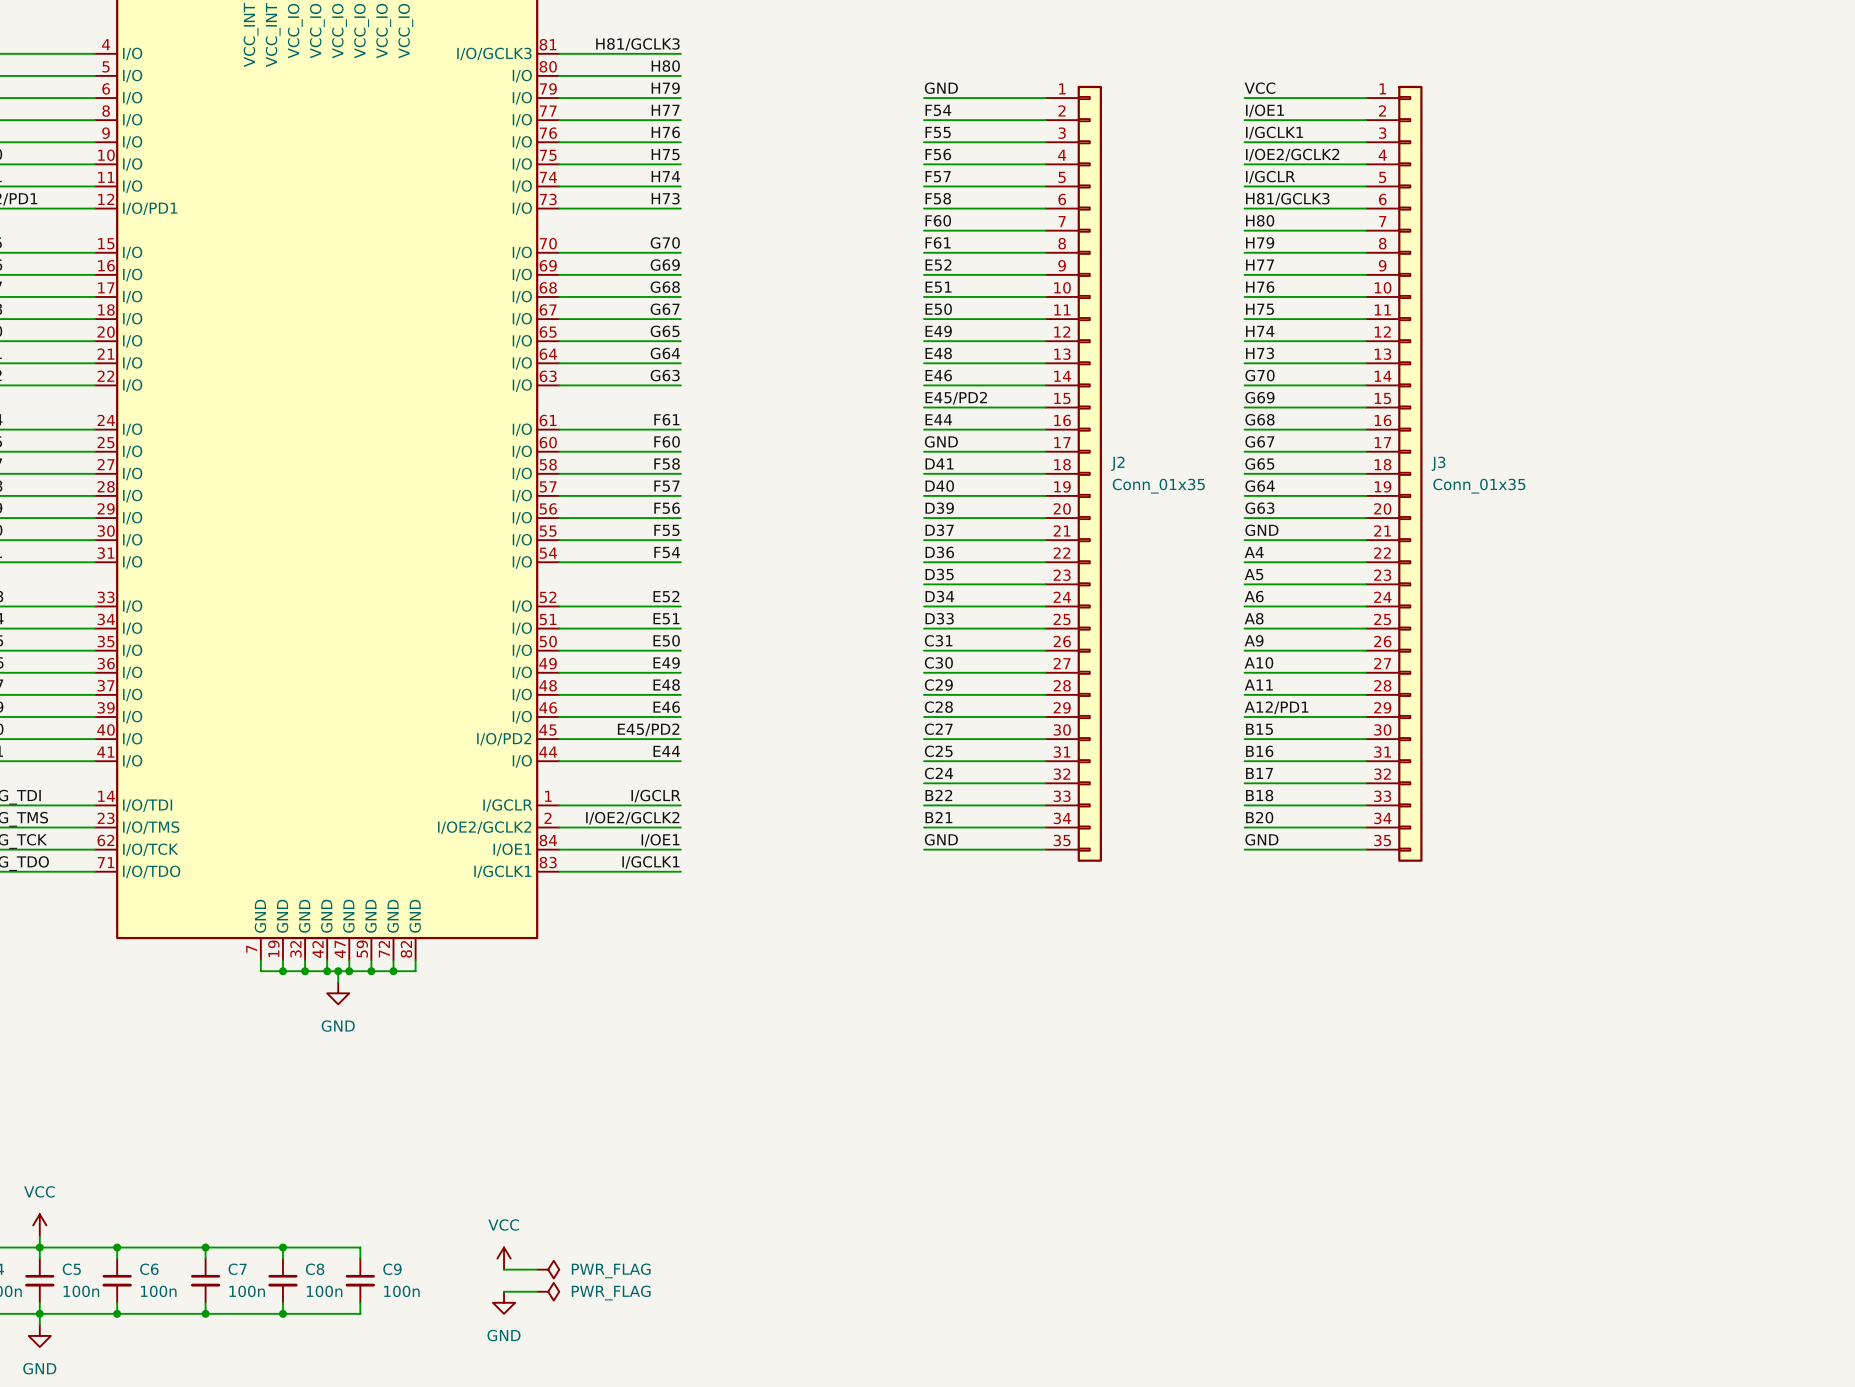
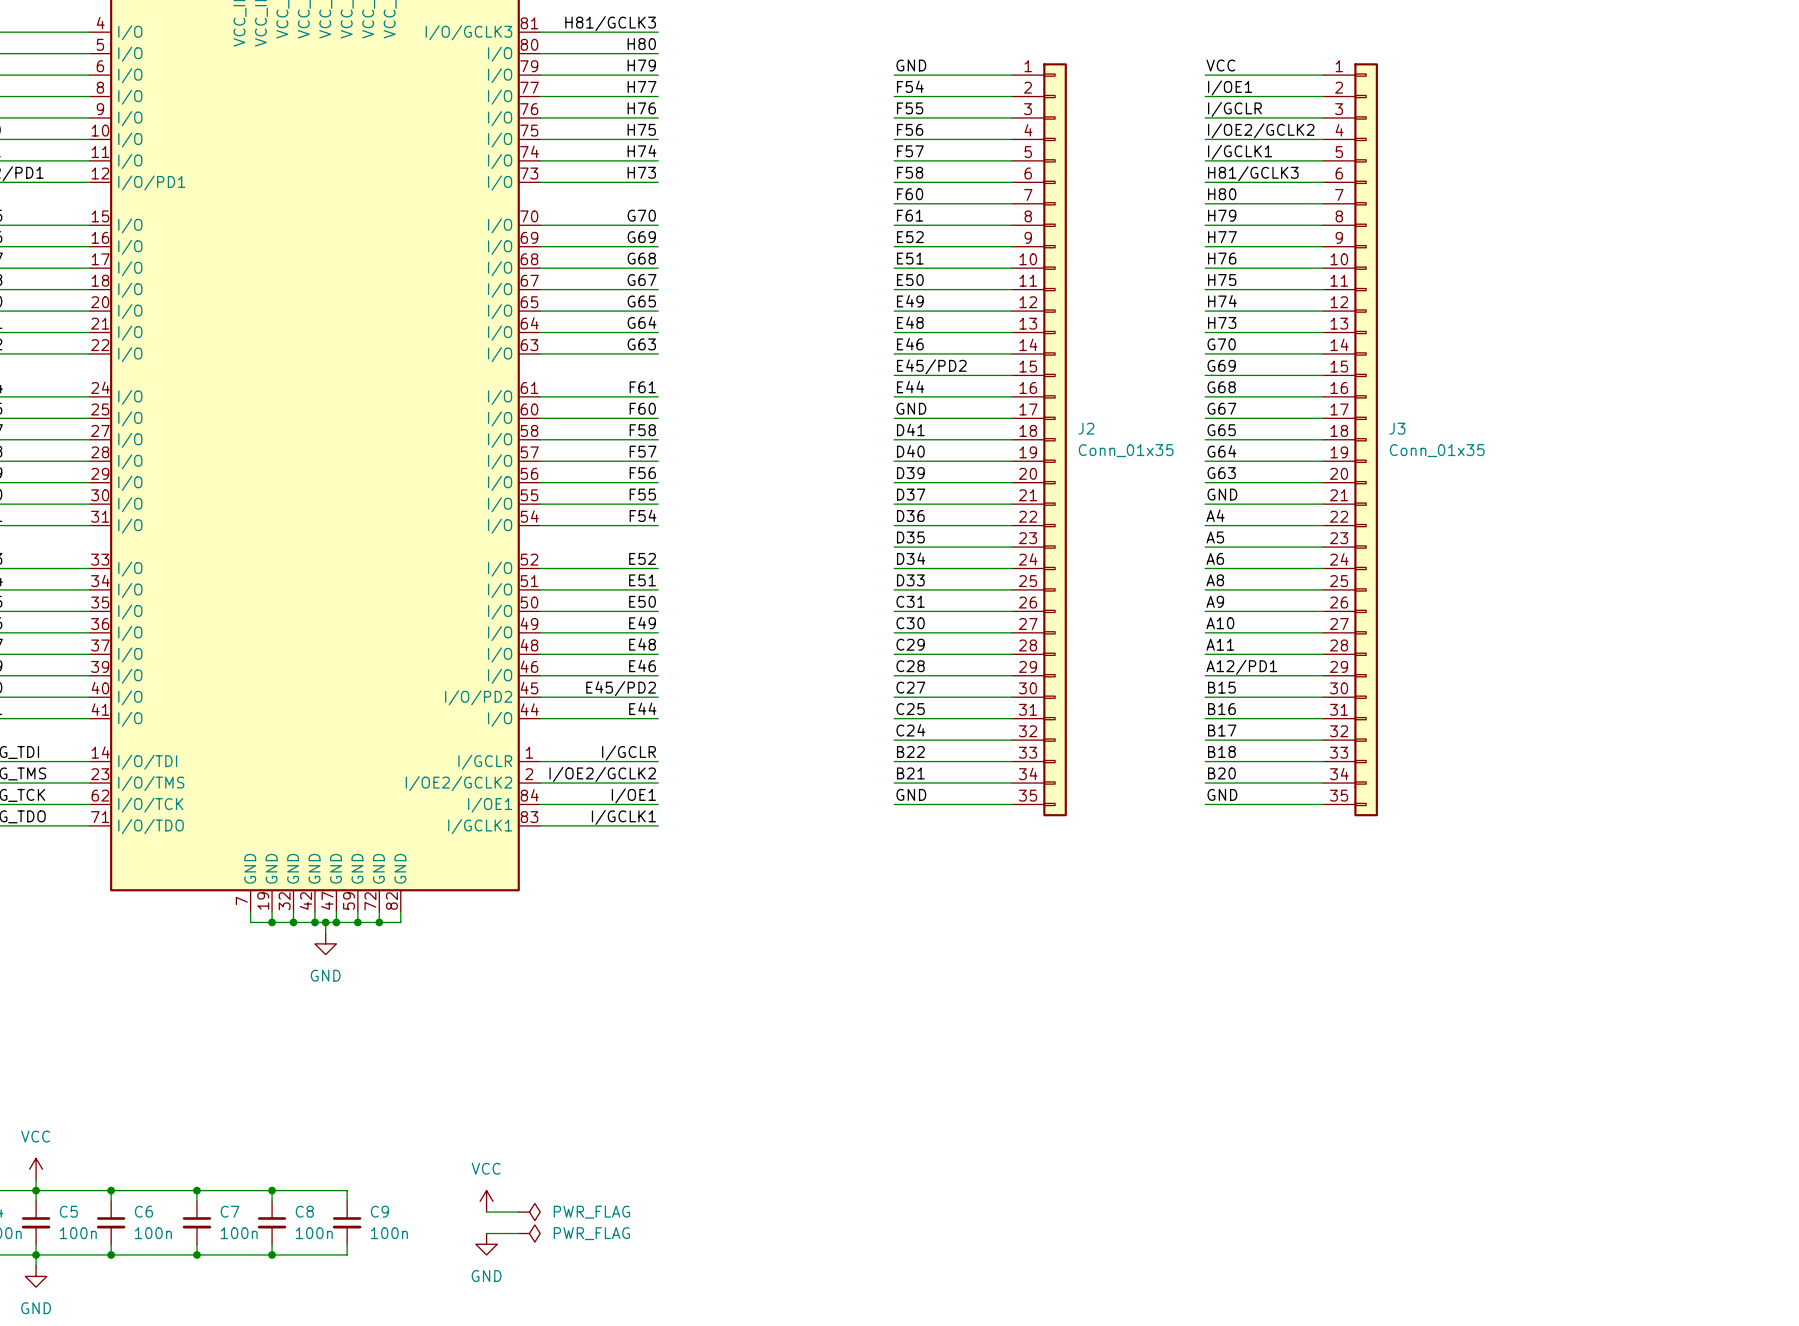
label: I/GCLK1 (1274, 132) -> I/GCLR (1234, 109)
label: I/GCLR (1270, 177) -> I/GCLK1 (1240, 152)

